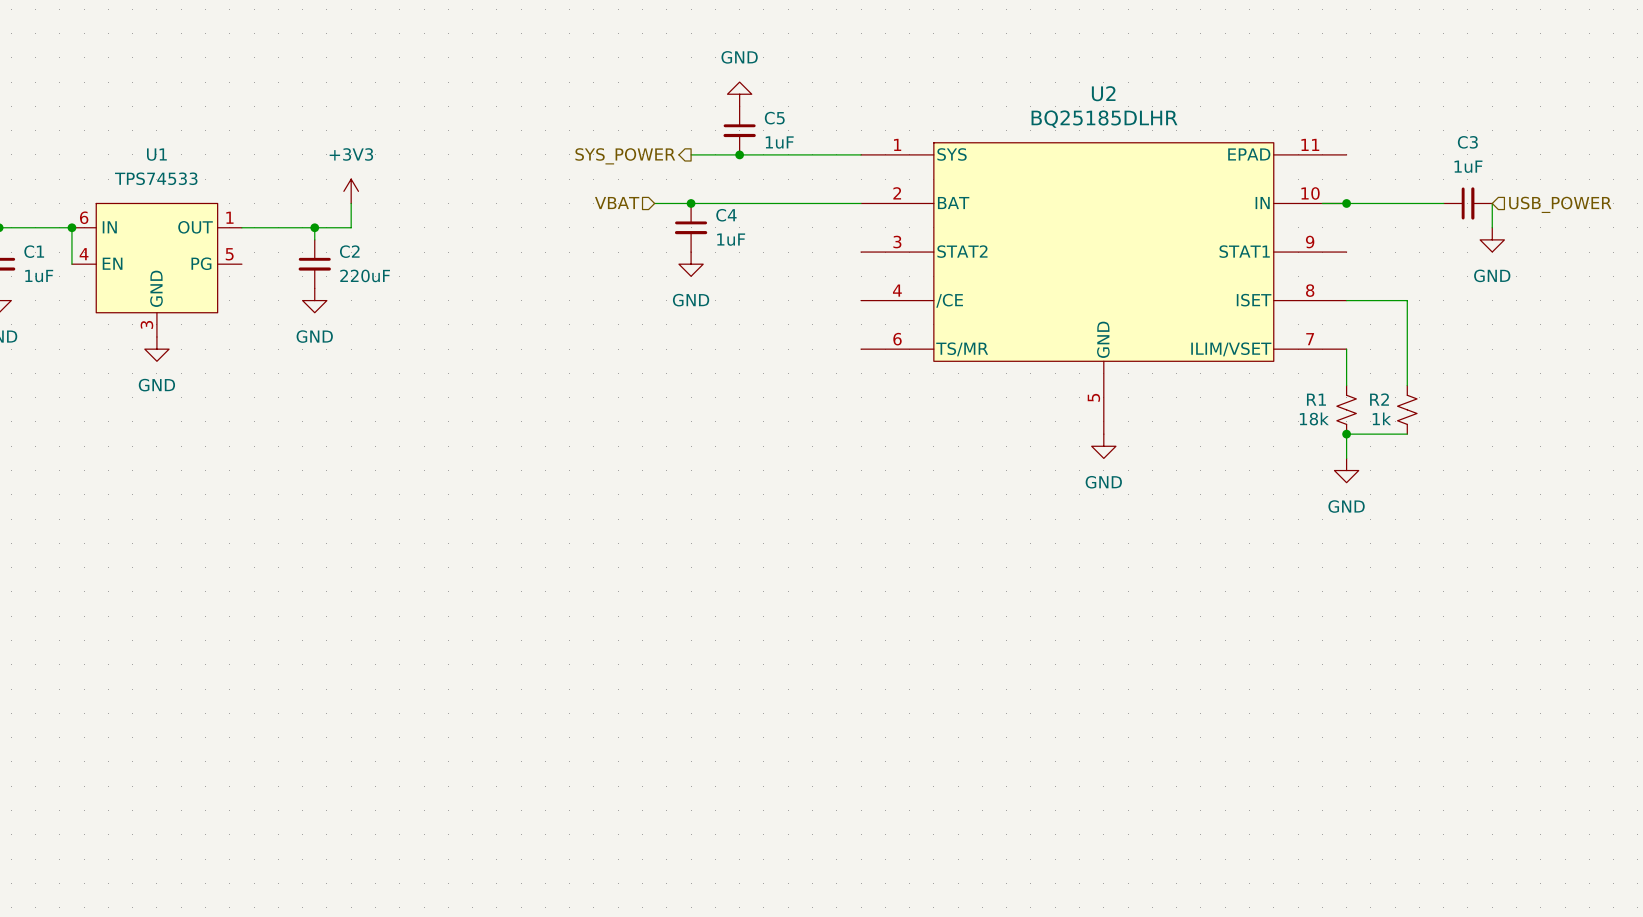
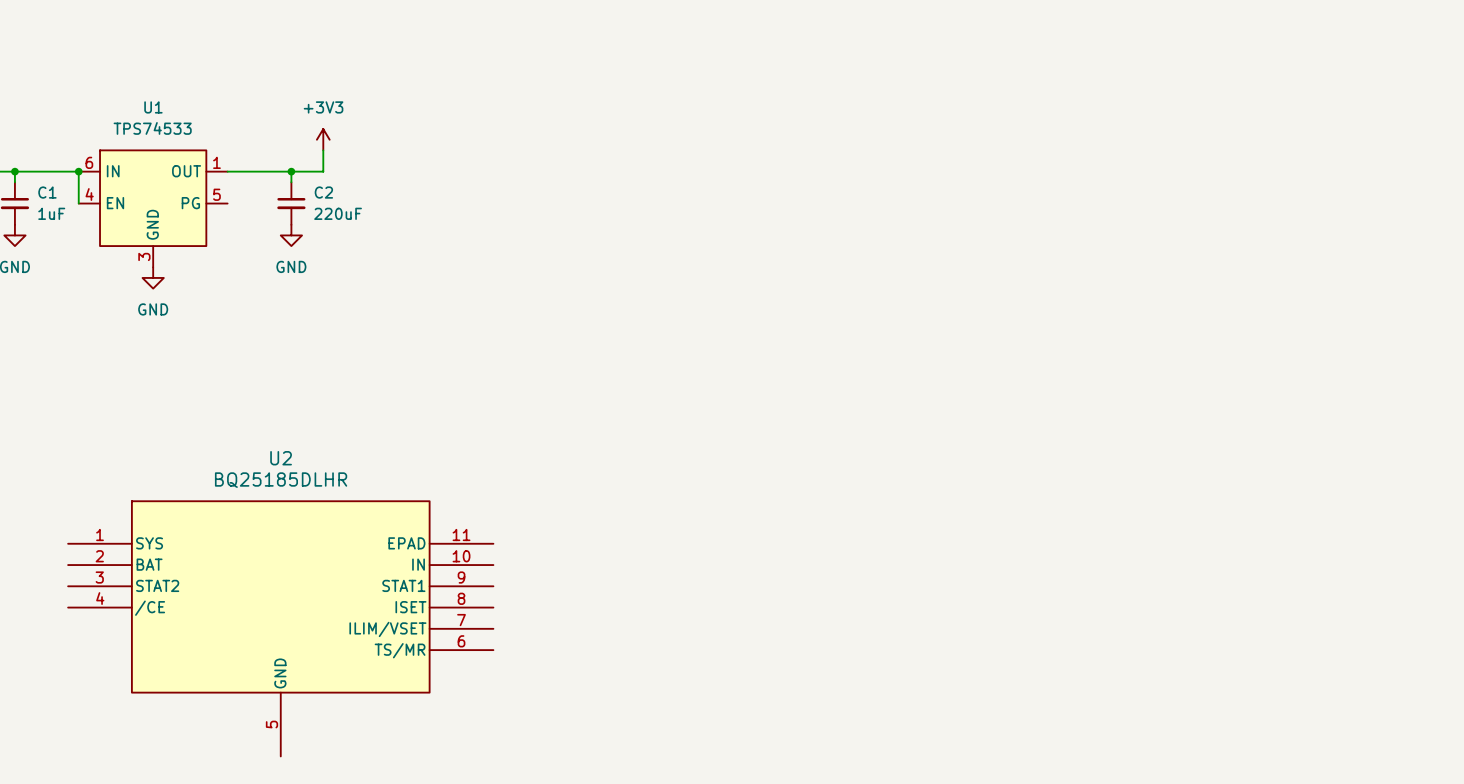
power symbol: GND (739, 94) -> none
C5: 1uF (739, 130) -> none
U2 symbol: [861, 142, 1347, 435] -> [68, 501, 494, 757]
wire: (691, 154) (861, 154) -> none
junction: (739, 154) -> none
hierarchical label: SYS_POWER (625, 156) -> none
hierarchical label: VBAT (617, 203) -> none
wire: (654, 203) (861, 203) -> none
junction: (691, 203) -> none
wire: (1322, 203) (1443, 203) -> none
junction: (1346, 203) -> none
C3: 1uF (1467, 203) -> none
wire: (1492, 203) (1492, 227) -> none
hierarchical label: USB_POWER (1560, 204) -> none
C4: 1uF (691, 227) -> none
power symbol: GND (1492, 239) -> none
power symbol: GND (691, 264) -> none
wire: (1346, 300) (1407, 300) (1407, 385) -> none
wire: (1346, 349) (1346, 385) -> none
R1: 18k (1346, 409) -> none
R2: 1k (1407, 409) -> none
junction: (1346, 434) -> none
wire: (1407, 434) (1346, 434) (1346, 458) -> none
power symbol: GND (1103, 446) -> none
power symbol: GND (1346, 470) -> none

